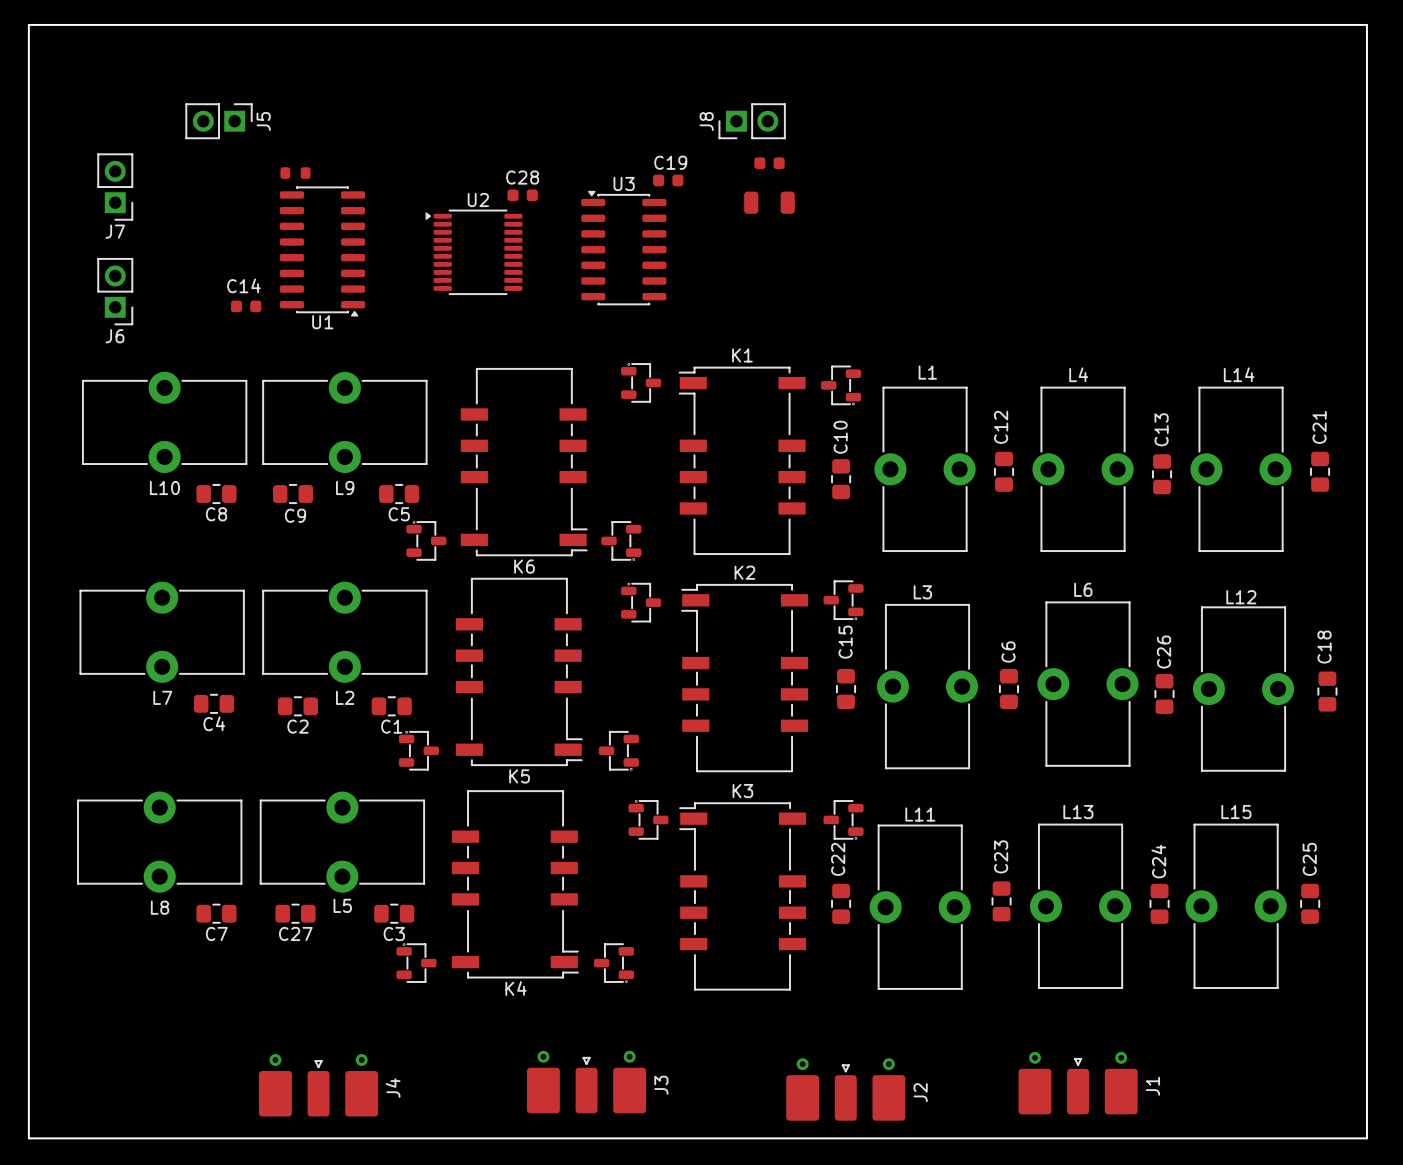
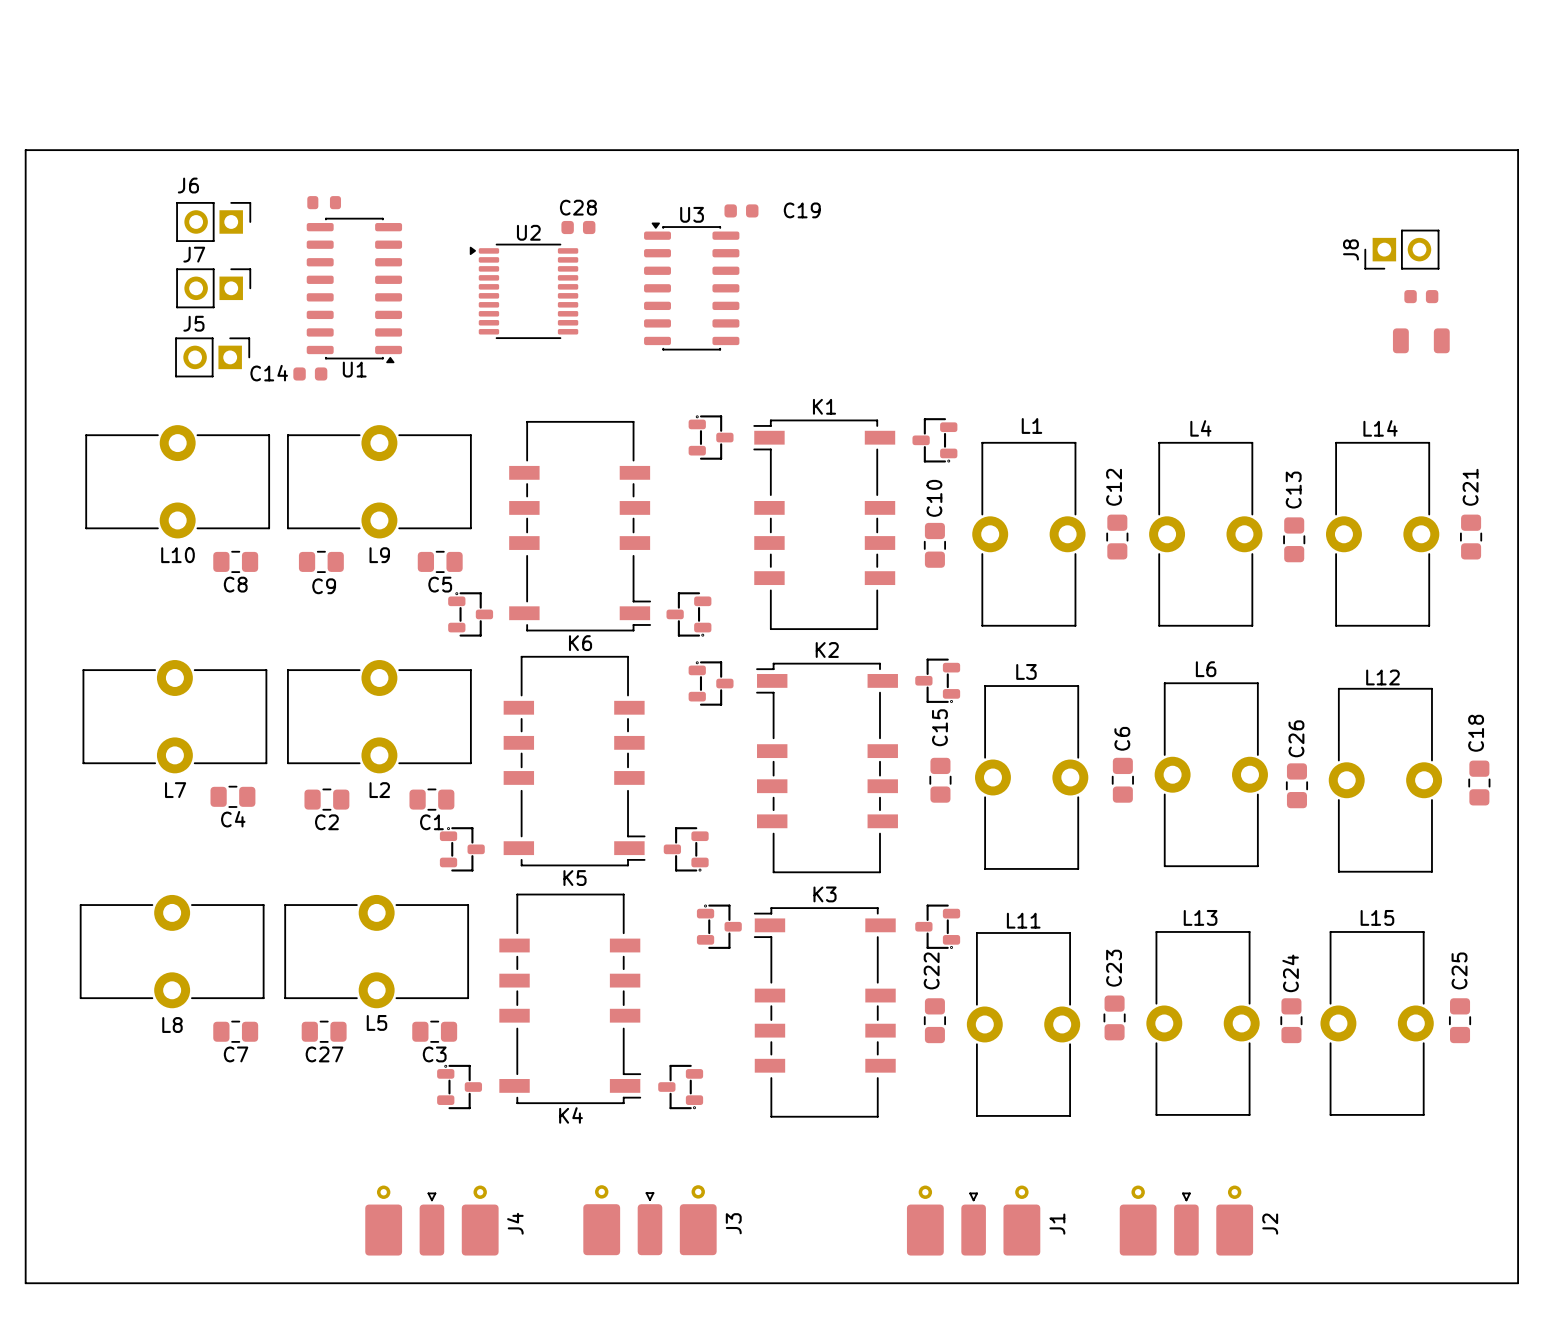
J5 position: (219, 121) -> (212, 357)
J5 name rotation: 0° (263, 121) -> 90° clockwise (193, 323)
J5 name position: J5 (263, 121) -> J5 (193, 323)
J8 position: (752, 121) -> (1401, 249)
board edge: (28, 126) (28, 24) (1366, 24) (1366, 1138) (1362, 1138) -> (25, 150) (1518, 150) (1518, 1283)
C19 name position: C19 (670, 162) -> C19 (802, 210)
part: (769, 163) -> none
J7 rotation: 0° (115, 187) -> 90° counterclockwise (213, 288)
J7 position: (115, 187) -> (213, 288)
part: (769, 202) -> none
J7 name position: J7 (115, 231) -> J7 (194, 254)
part: none -> (1421, 296)
C14 name position: C14 (243, 285) -> C14 (269, 373)
J6 rotation: 0° (115, 291) -> 90° counterclockwise (213, 221)
J6 position: (115, 291) -> (213, 221)
part: none -> (1421, 340)
C14 position: (246, 306) -> (310, 373)
J6 name position: J6 (114, 336) -> J6 (188, 185)
J1 position: (1078, 1083) -> (973, 1220)
J4 position: (318, 1085) -> (431, 1220)
J2 position: (845, 1089) -> (1186, 1220)

